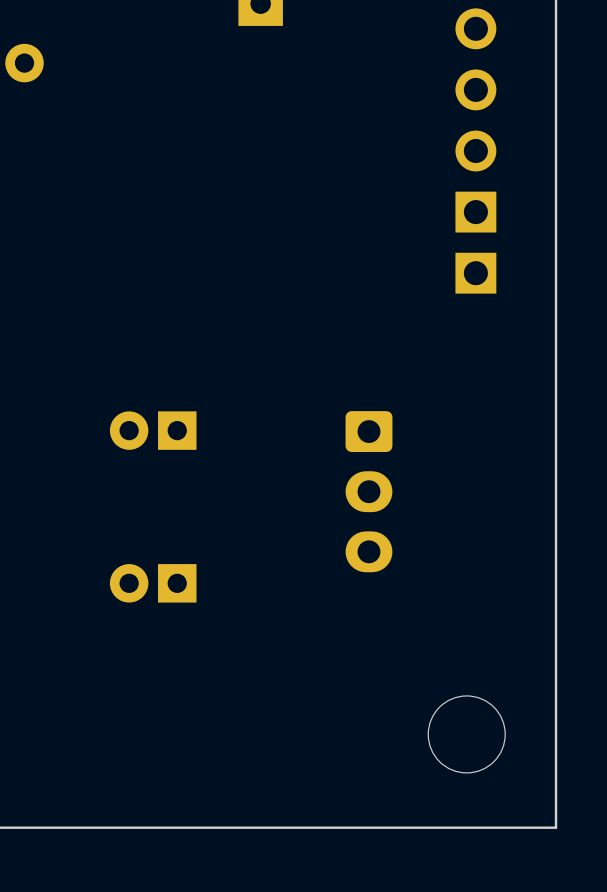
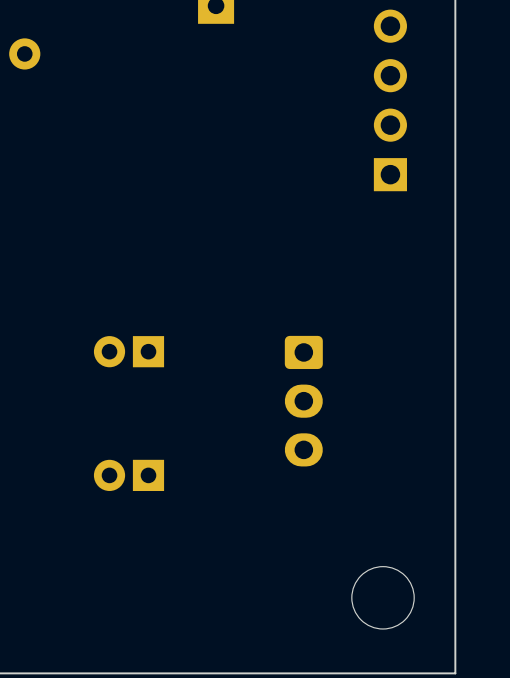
part: (475, 273) -> none

